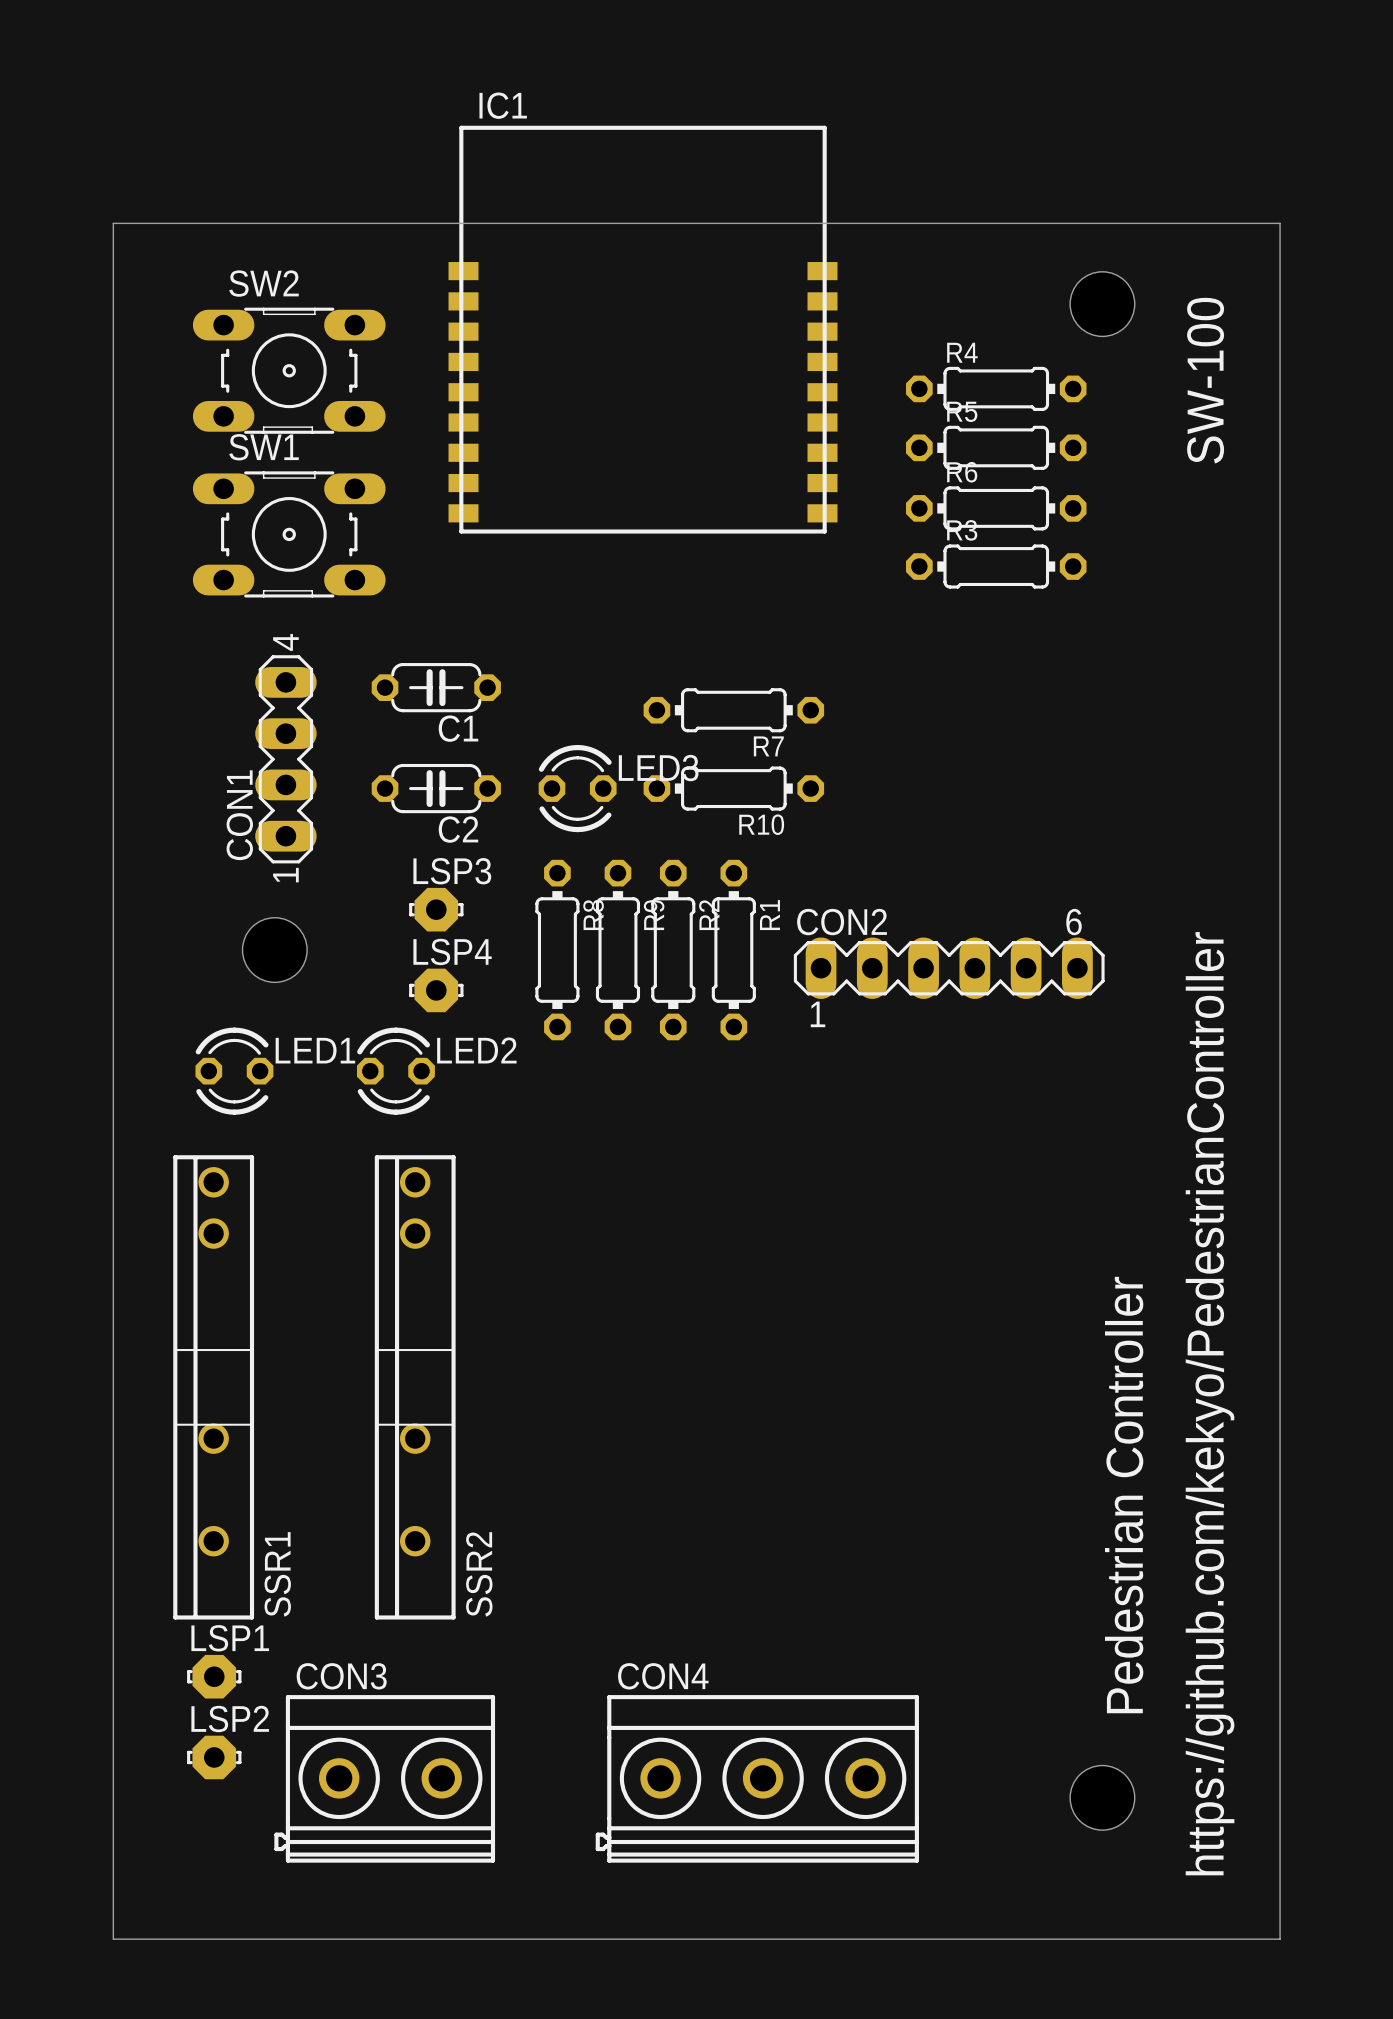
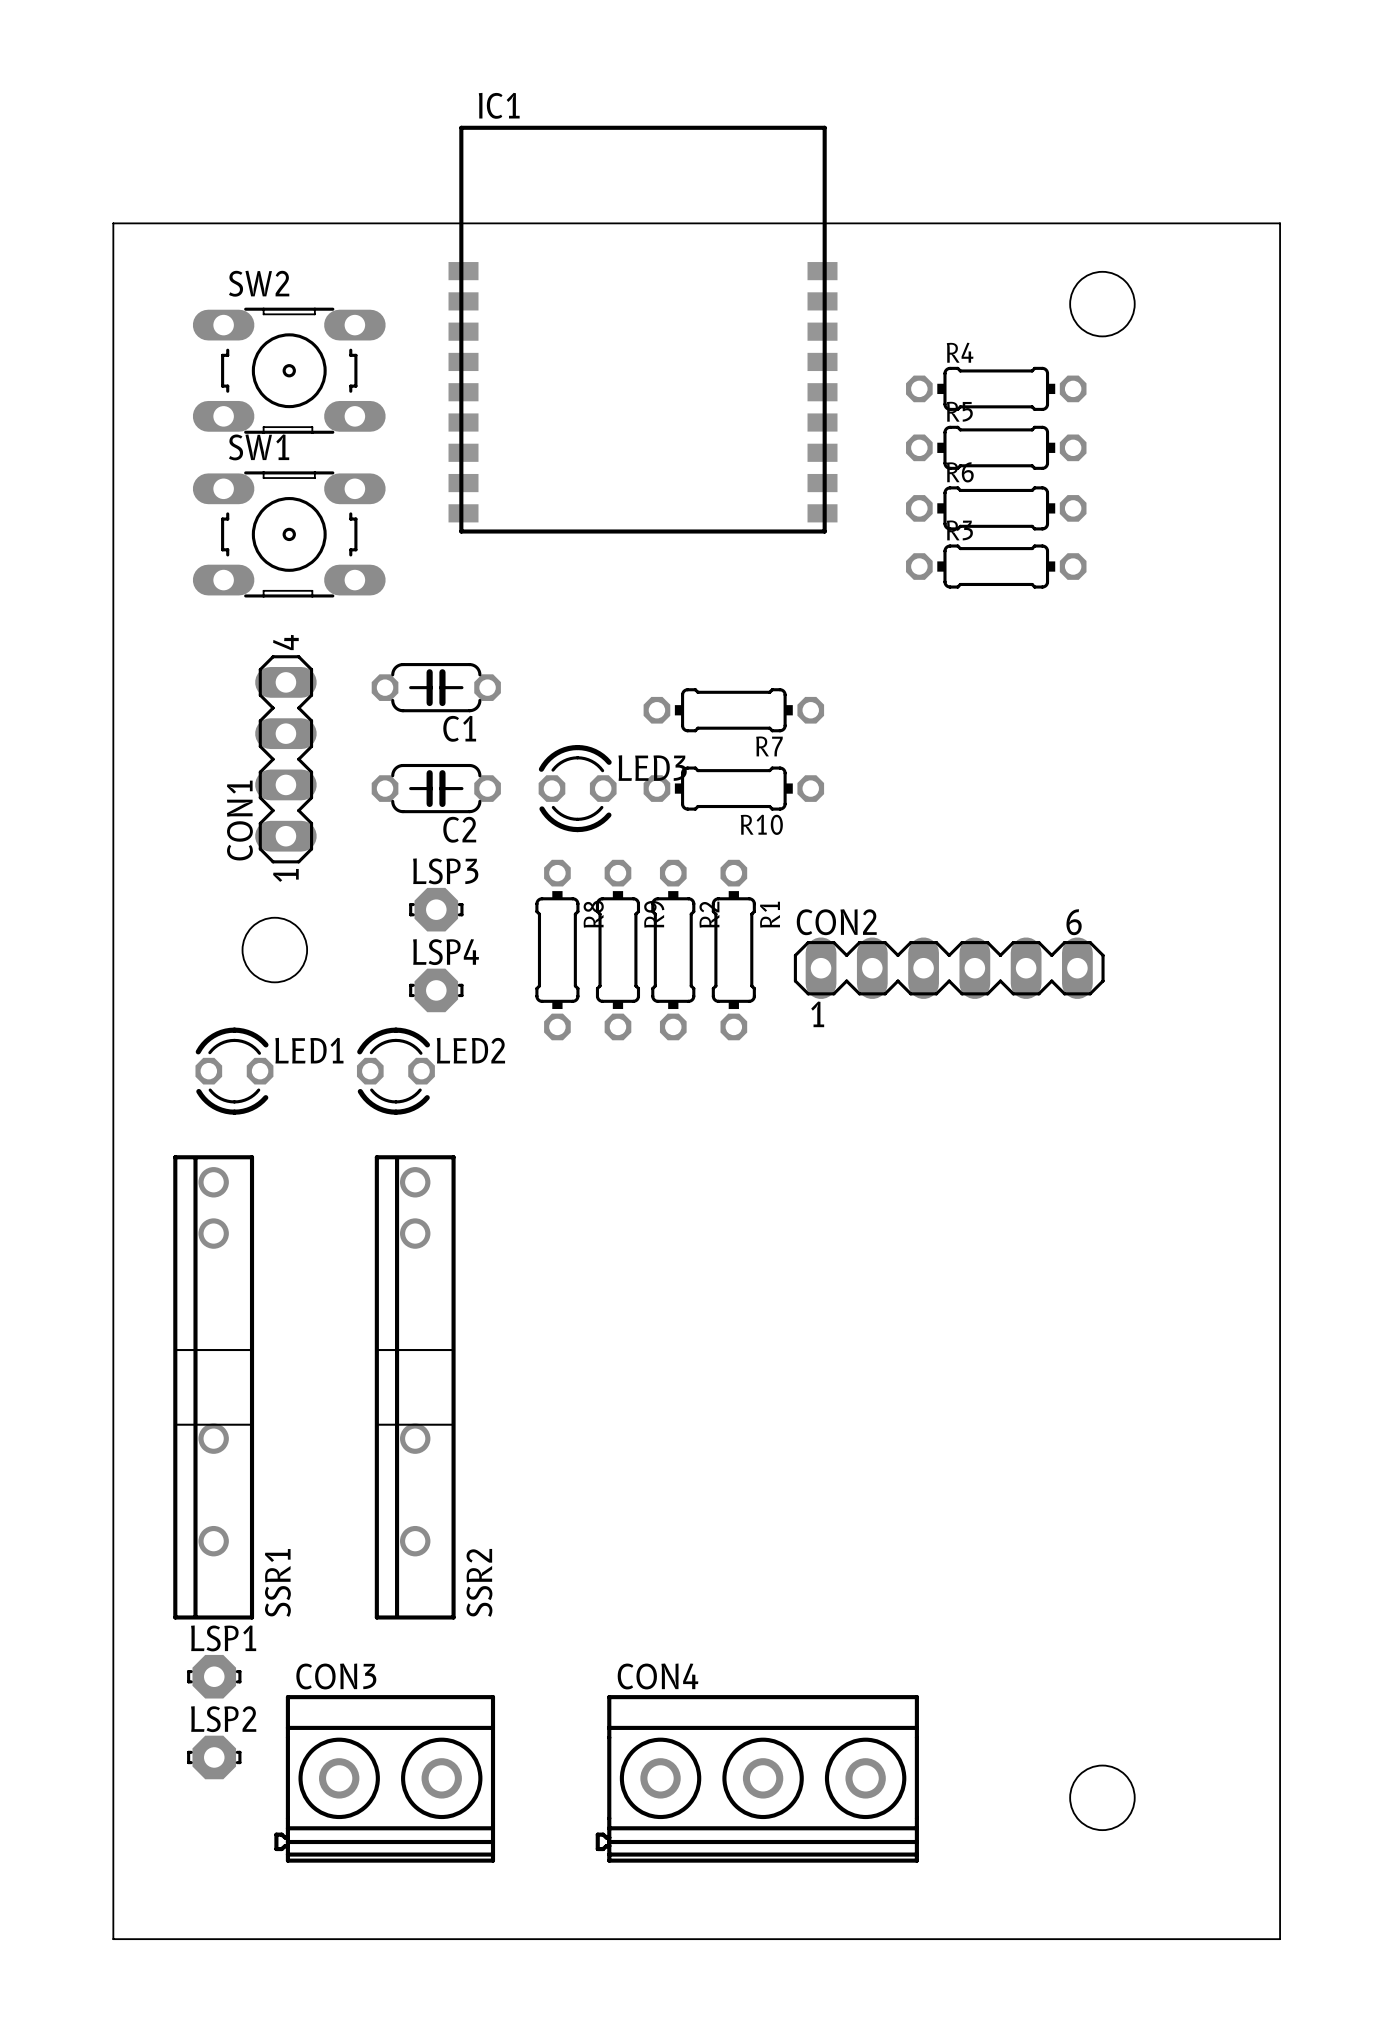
text: SW-100 (1205, 380) -> none
text: https://github.com/kekyo/PedestrianController (1210, 1403) -> none
text: Pedestrian Controller (1124, 1495) -> none

